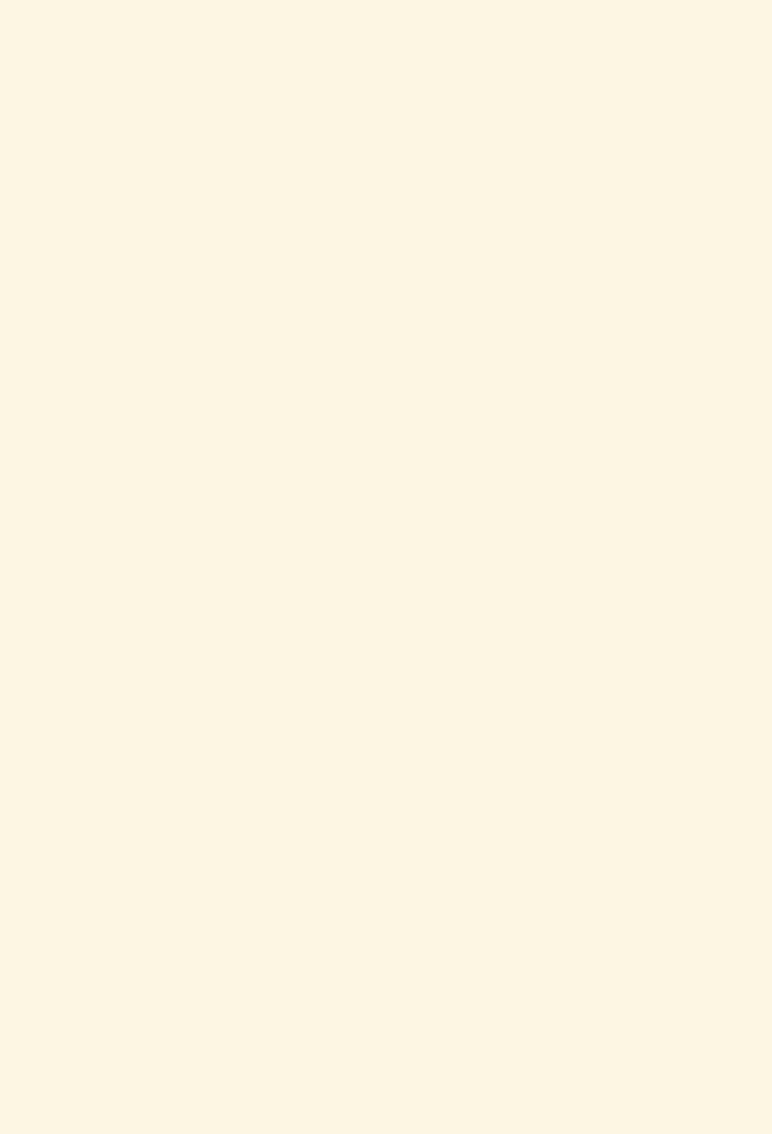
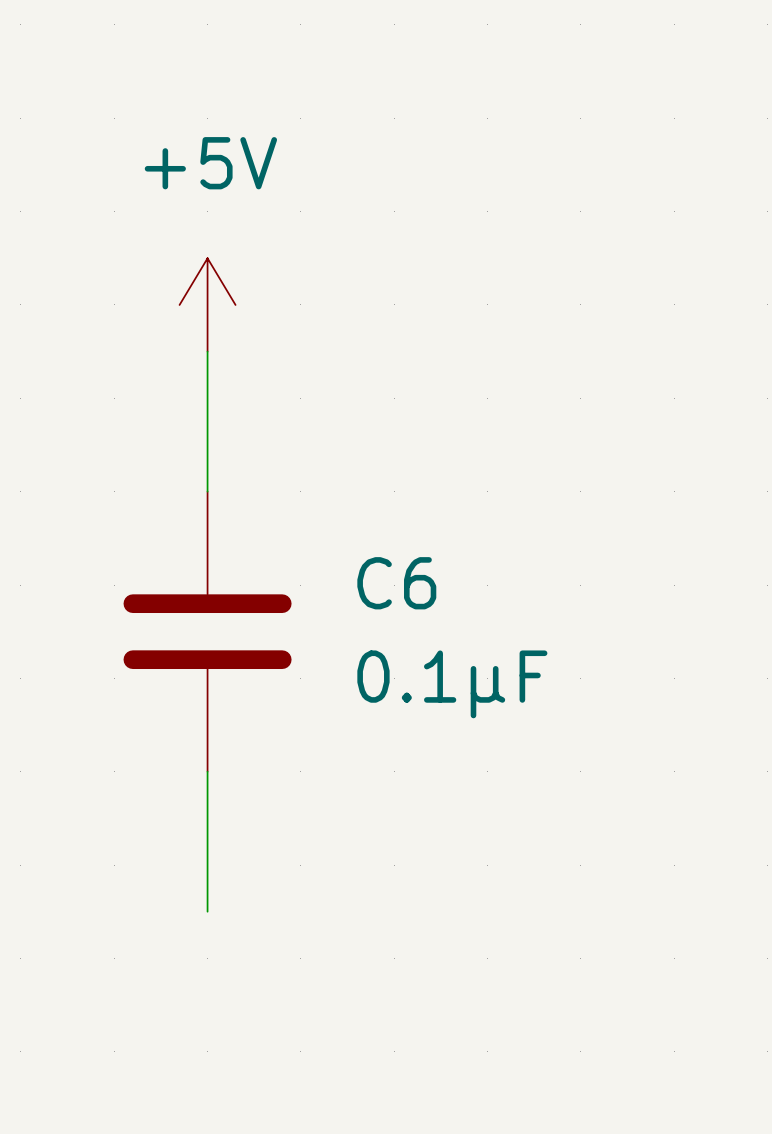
power symbol: none -> +5V (207, 304)
wire: none -> (207, 351) (207, 491)
C6: none -> 0.1µF (207, 631)
wire: none -> (207, 771) (207, 911)

